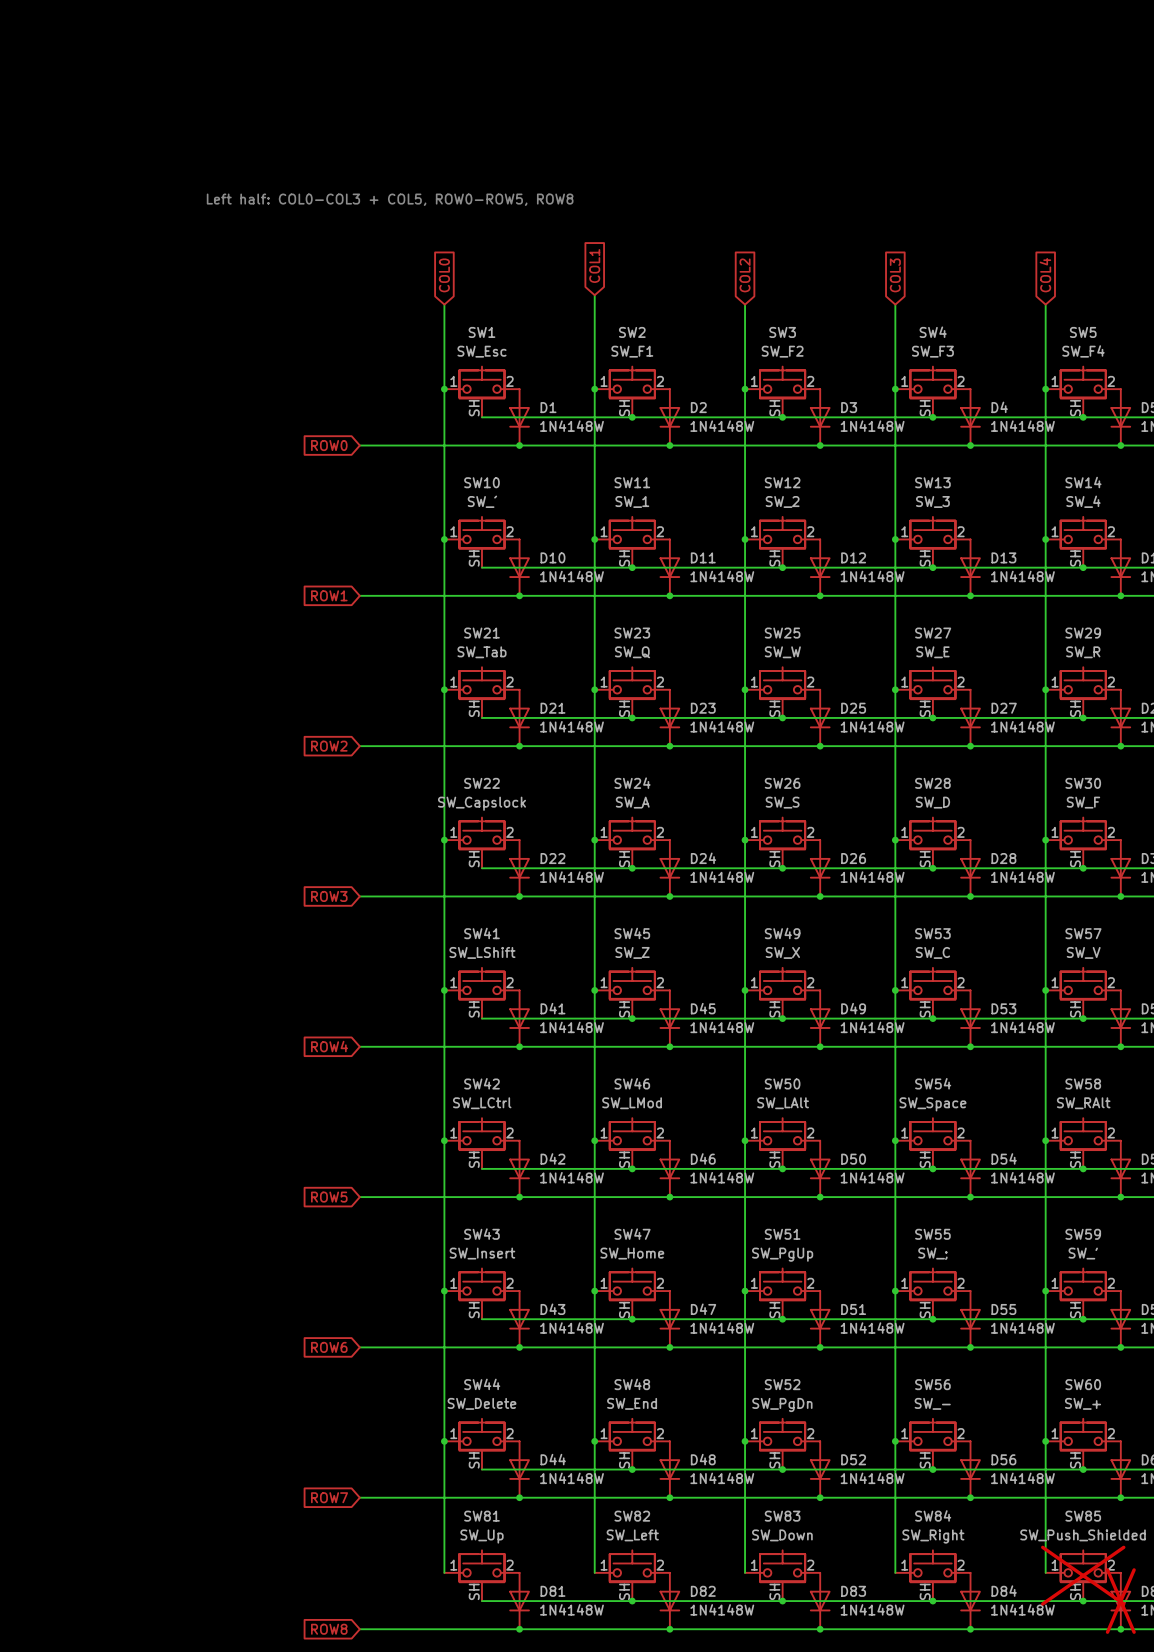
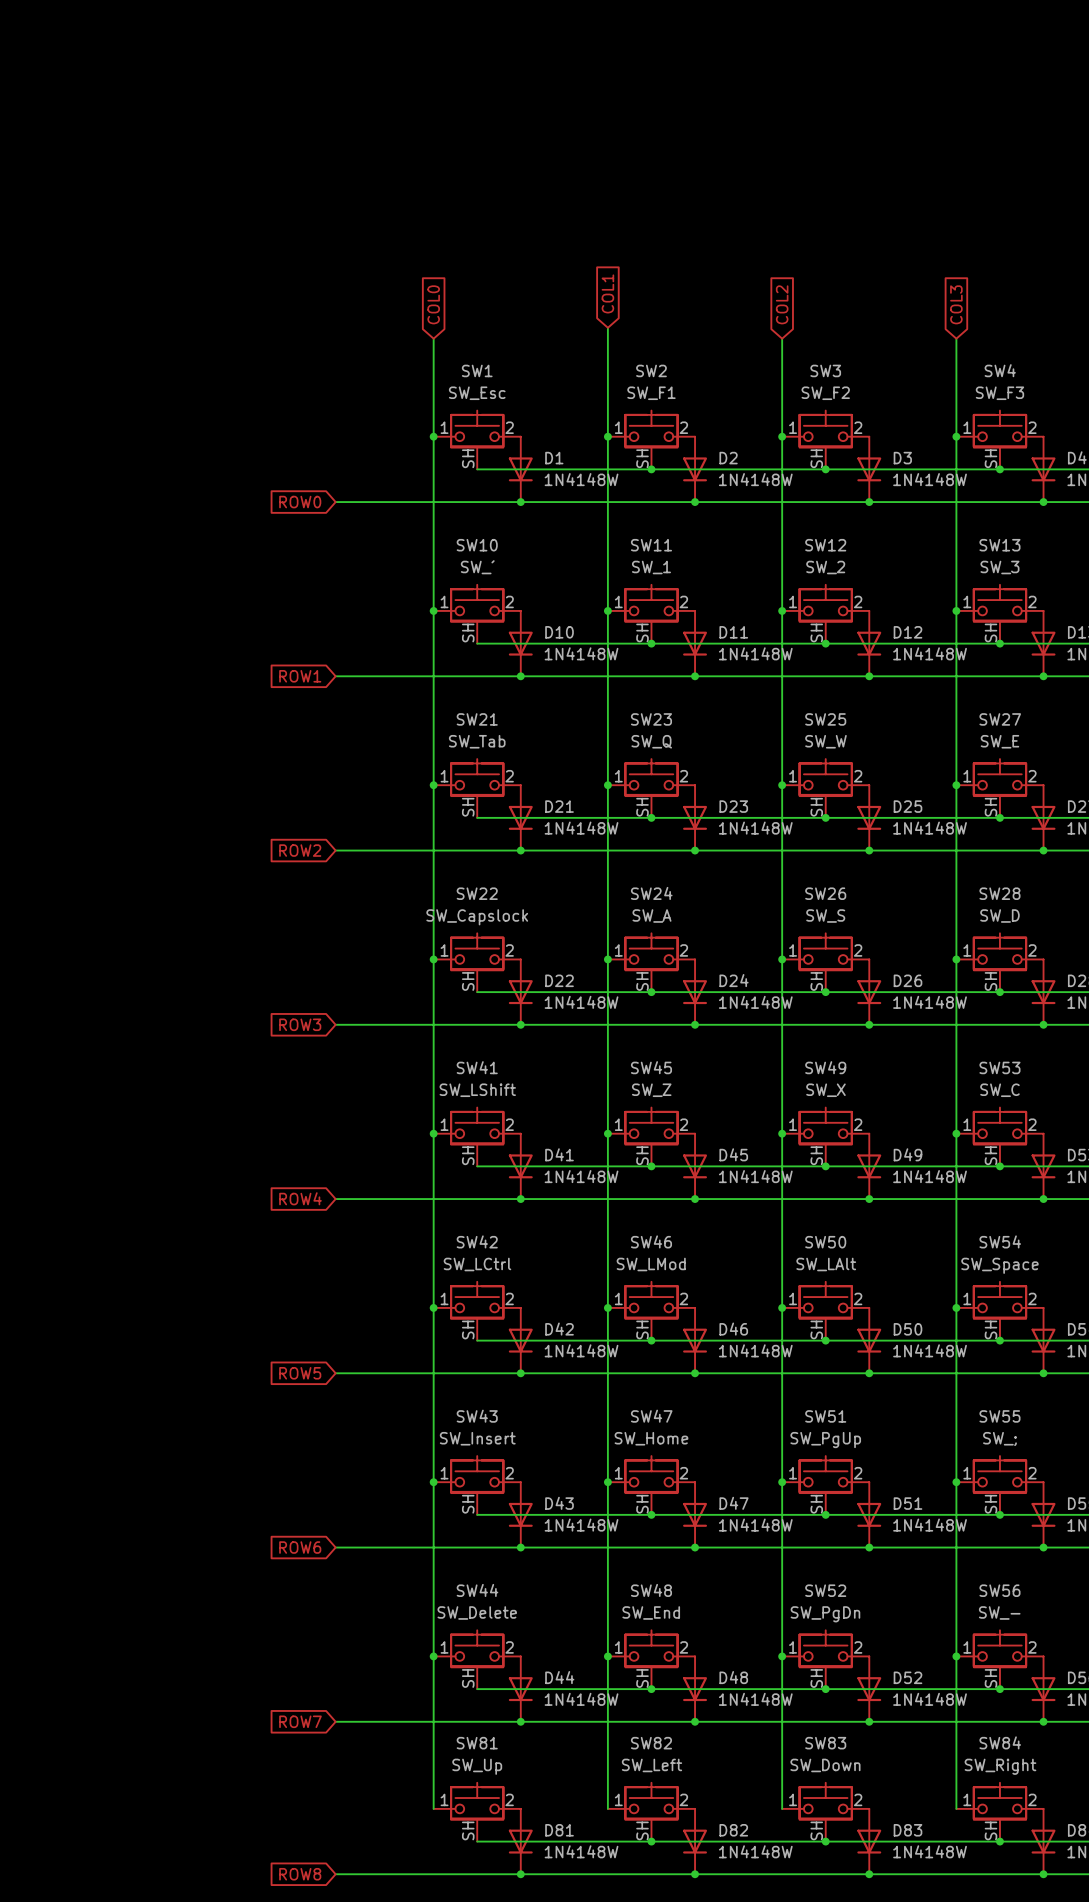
text: Left half: COL0-COL3 + COL5, ROW0-ROW5, ROW8 (390, 199) -> none

